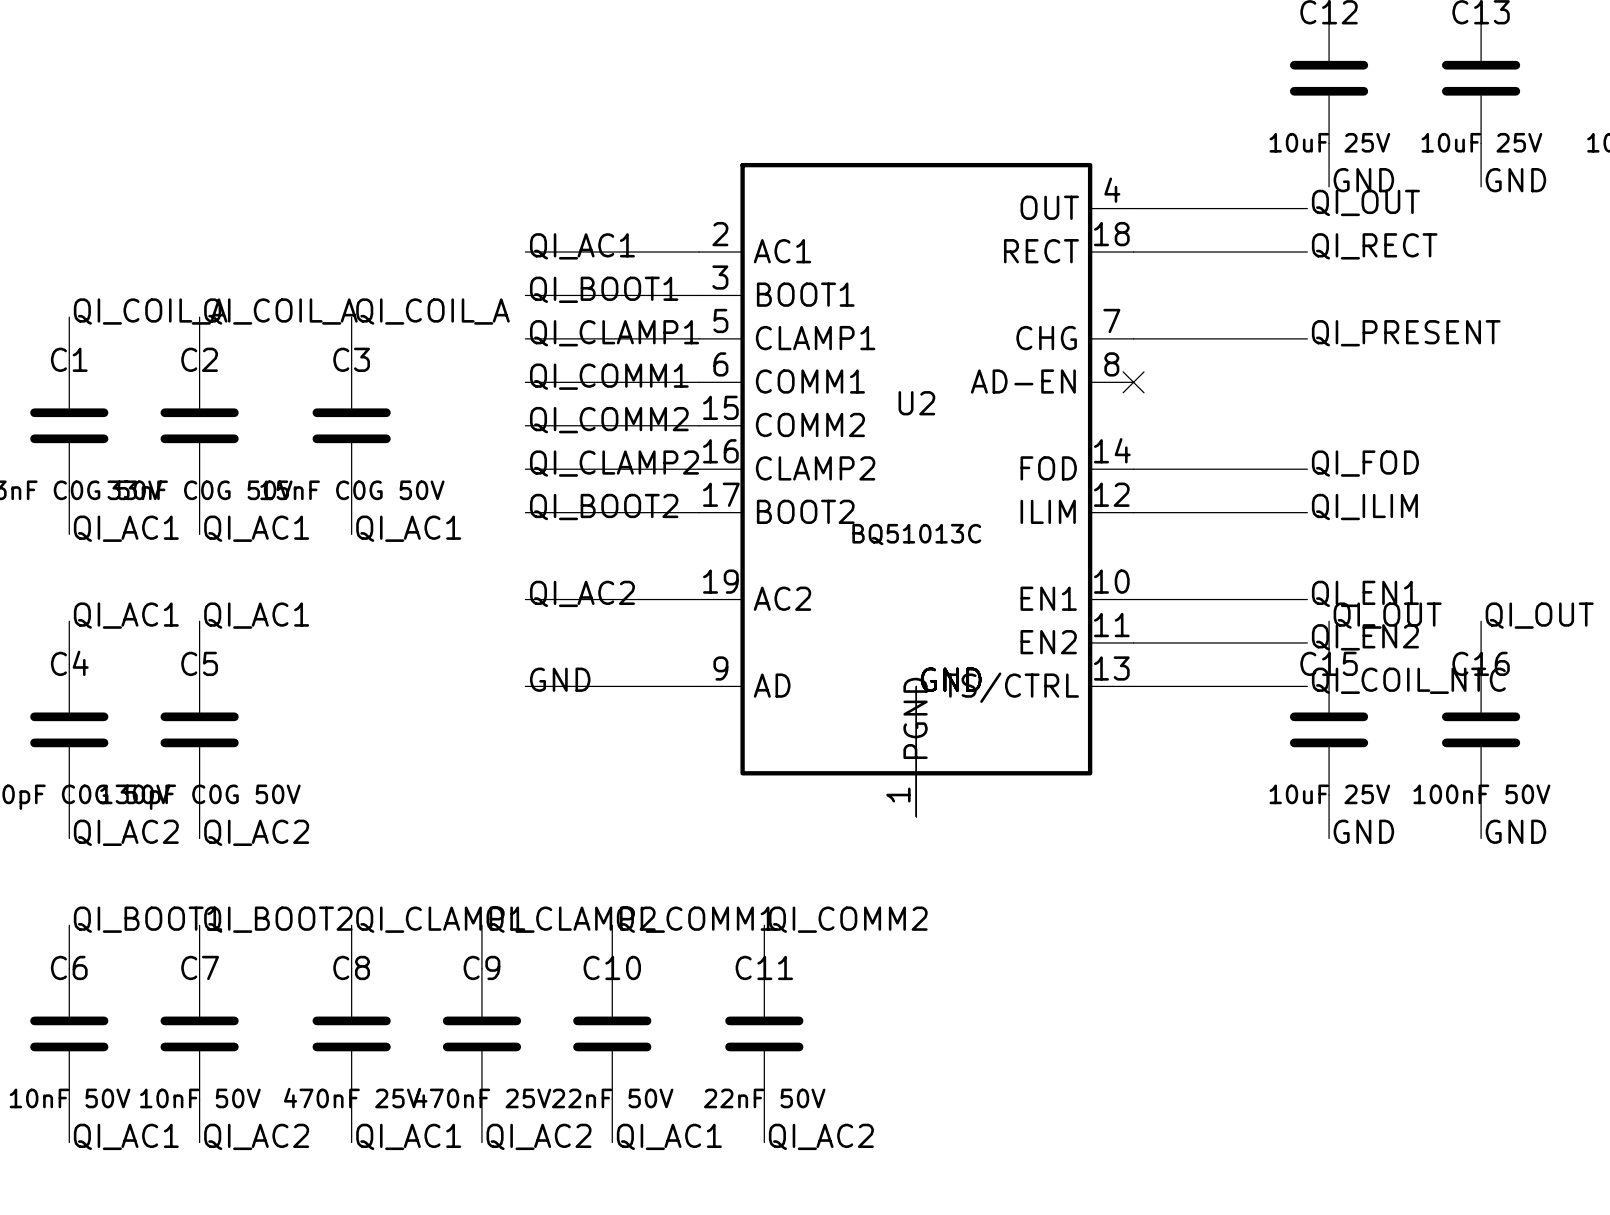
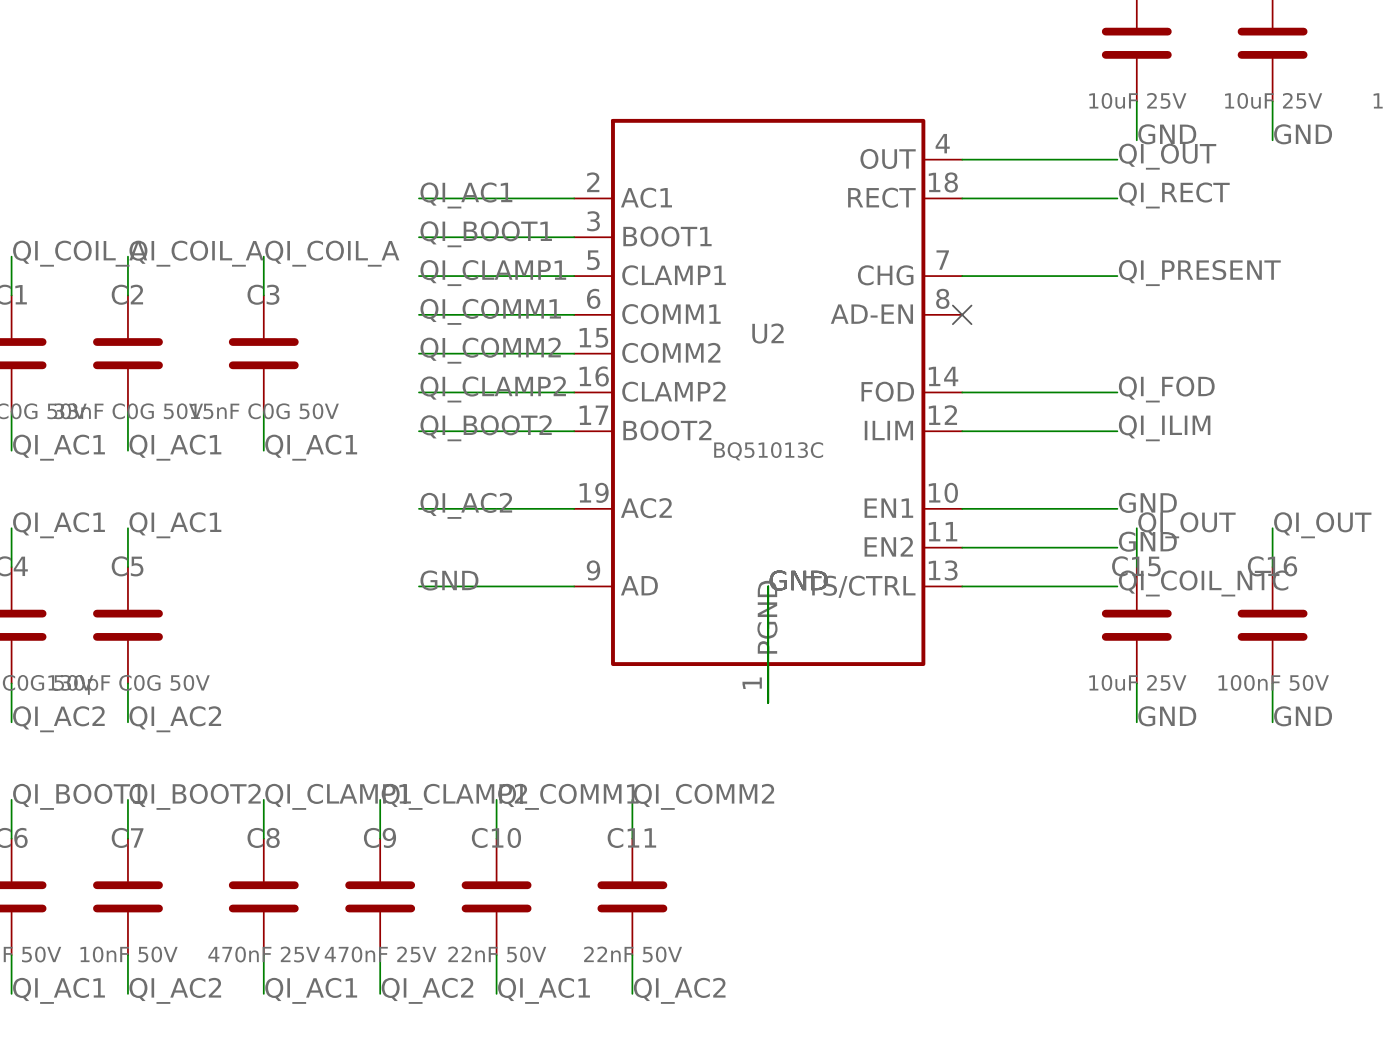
label: QI_EN1 (1365, 593) -> GND (1147, 502)
label: QI_EN2 (1365, 637) -> GND (1147, 541)

